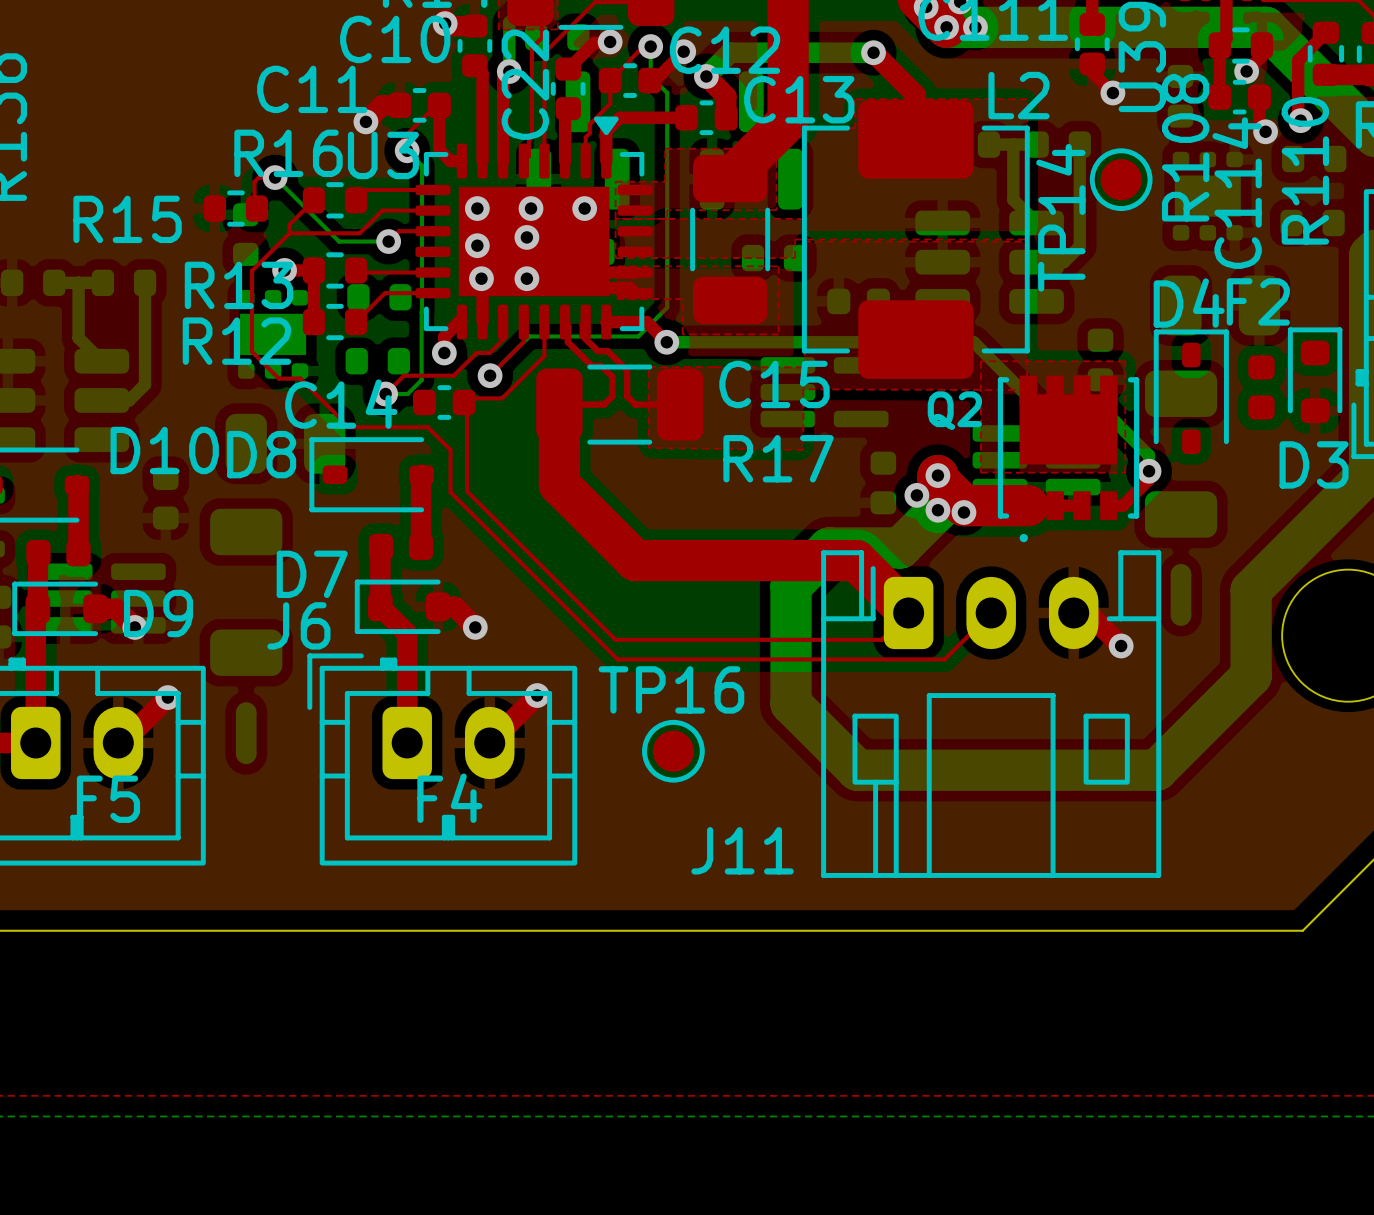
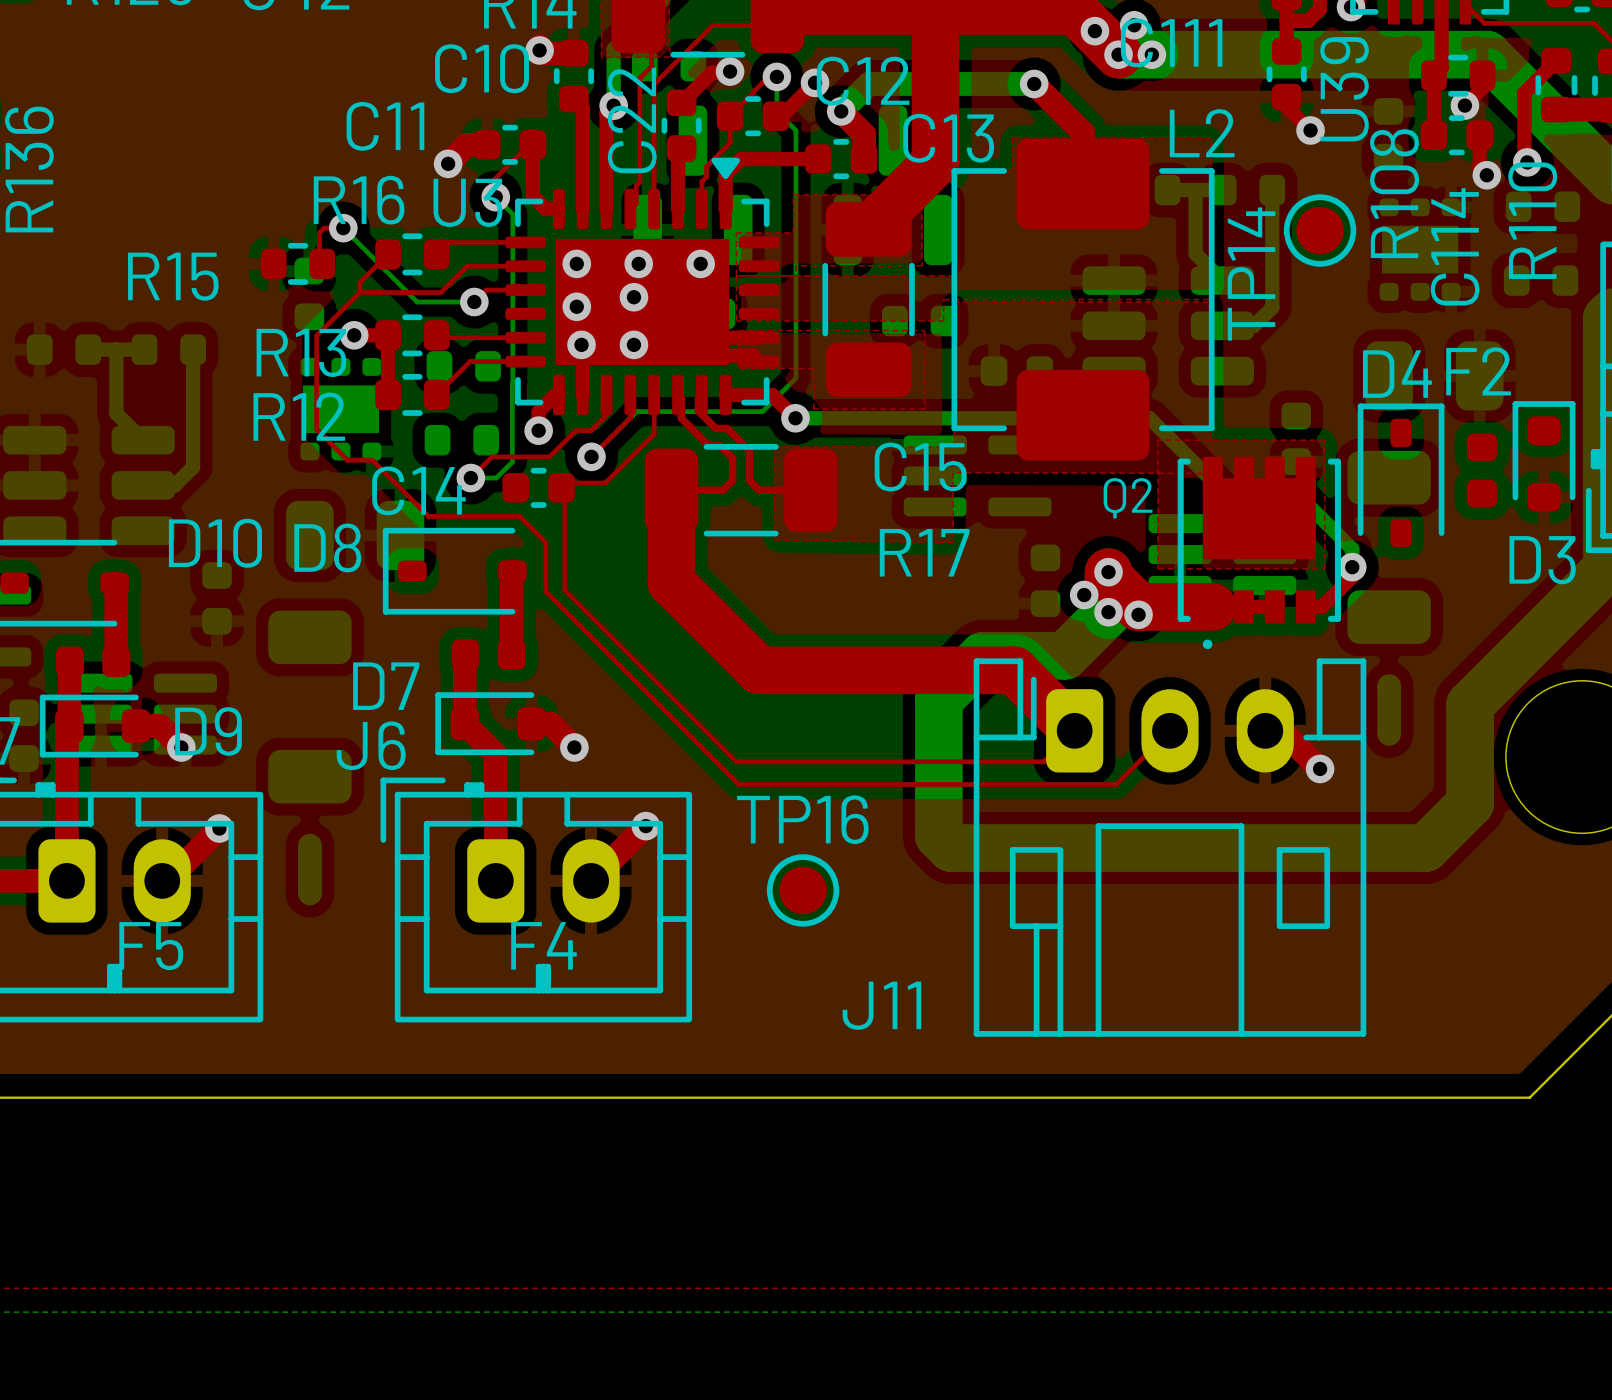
bottom track: (801, 714) (857, 770) (1156, 770) (1212, 714) -> (951, 848) (1425, 848)

